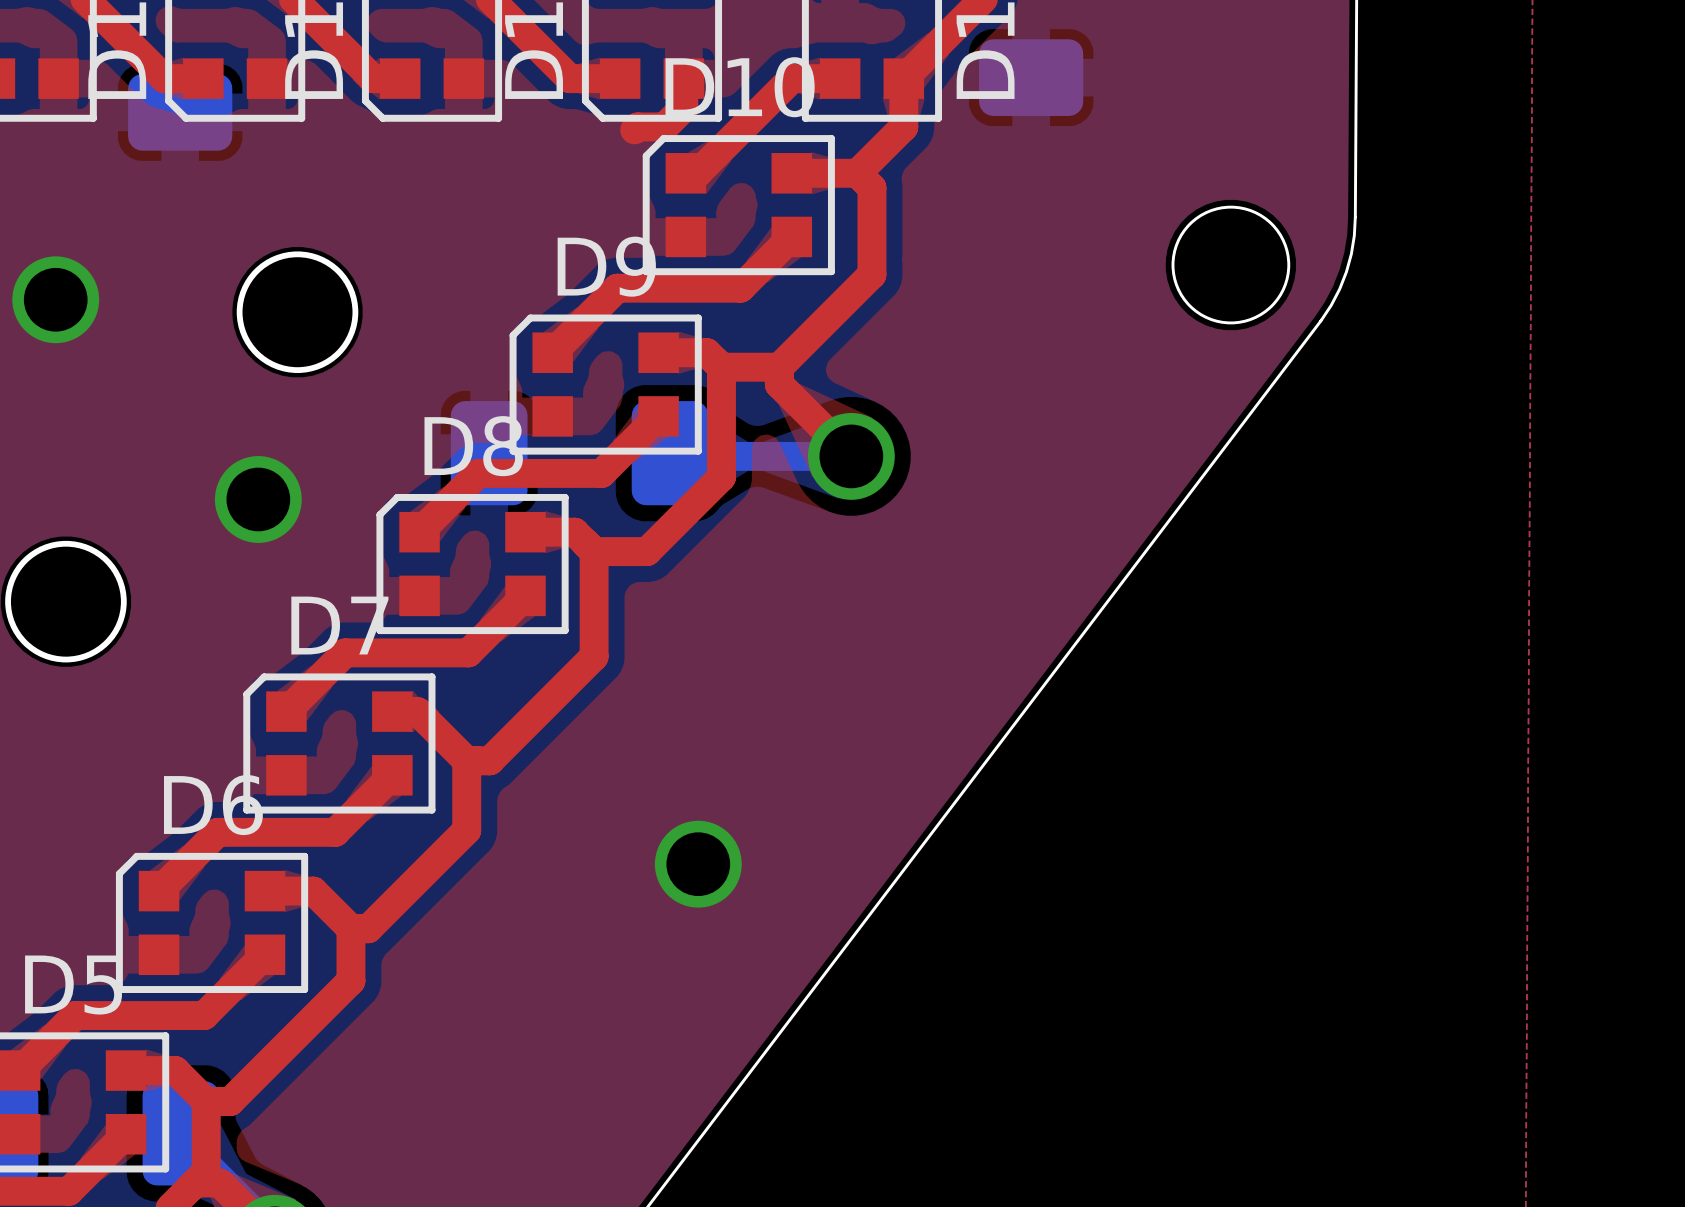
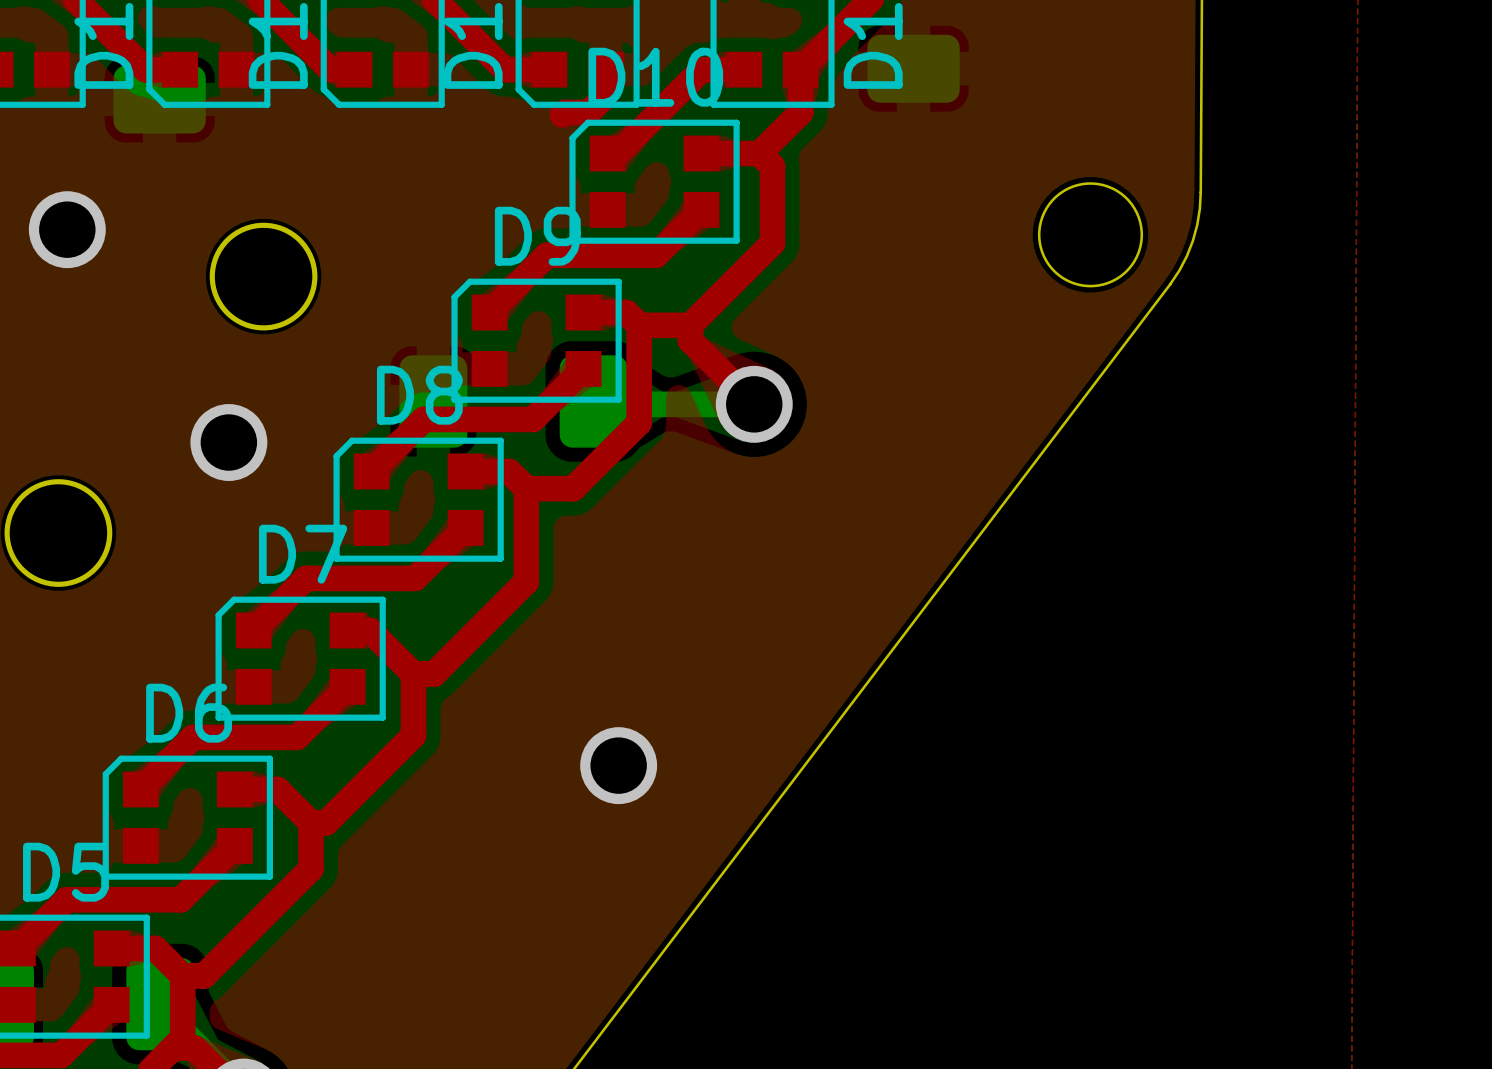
via position: (55, 299) -> (67, 229)

